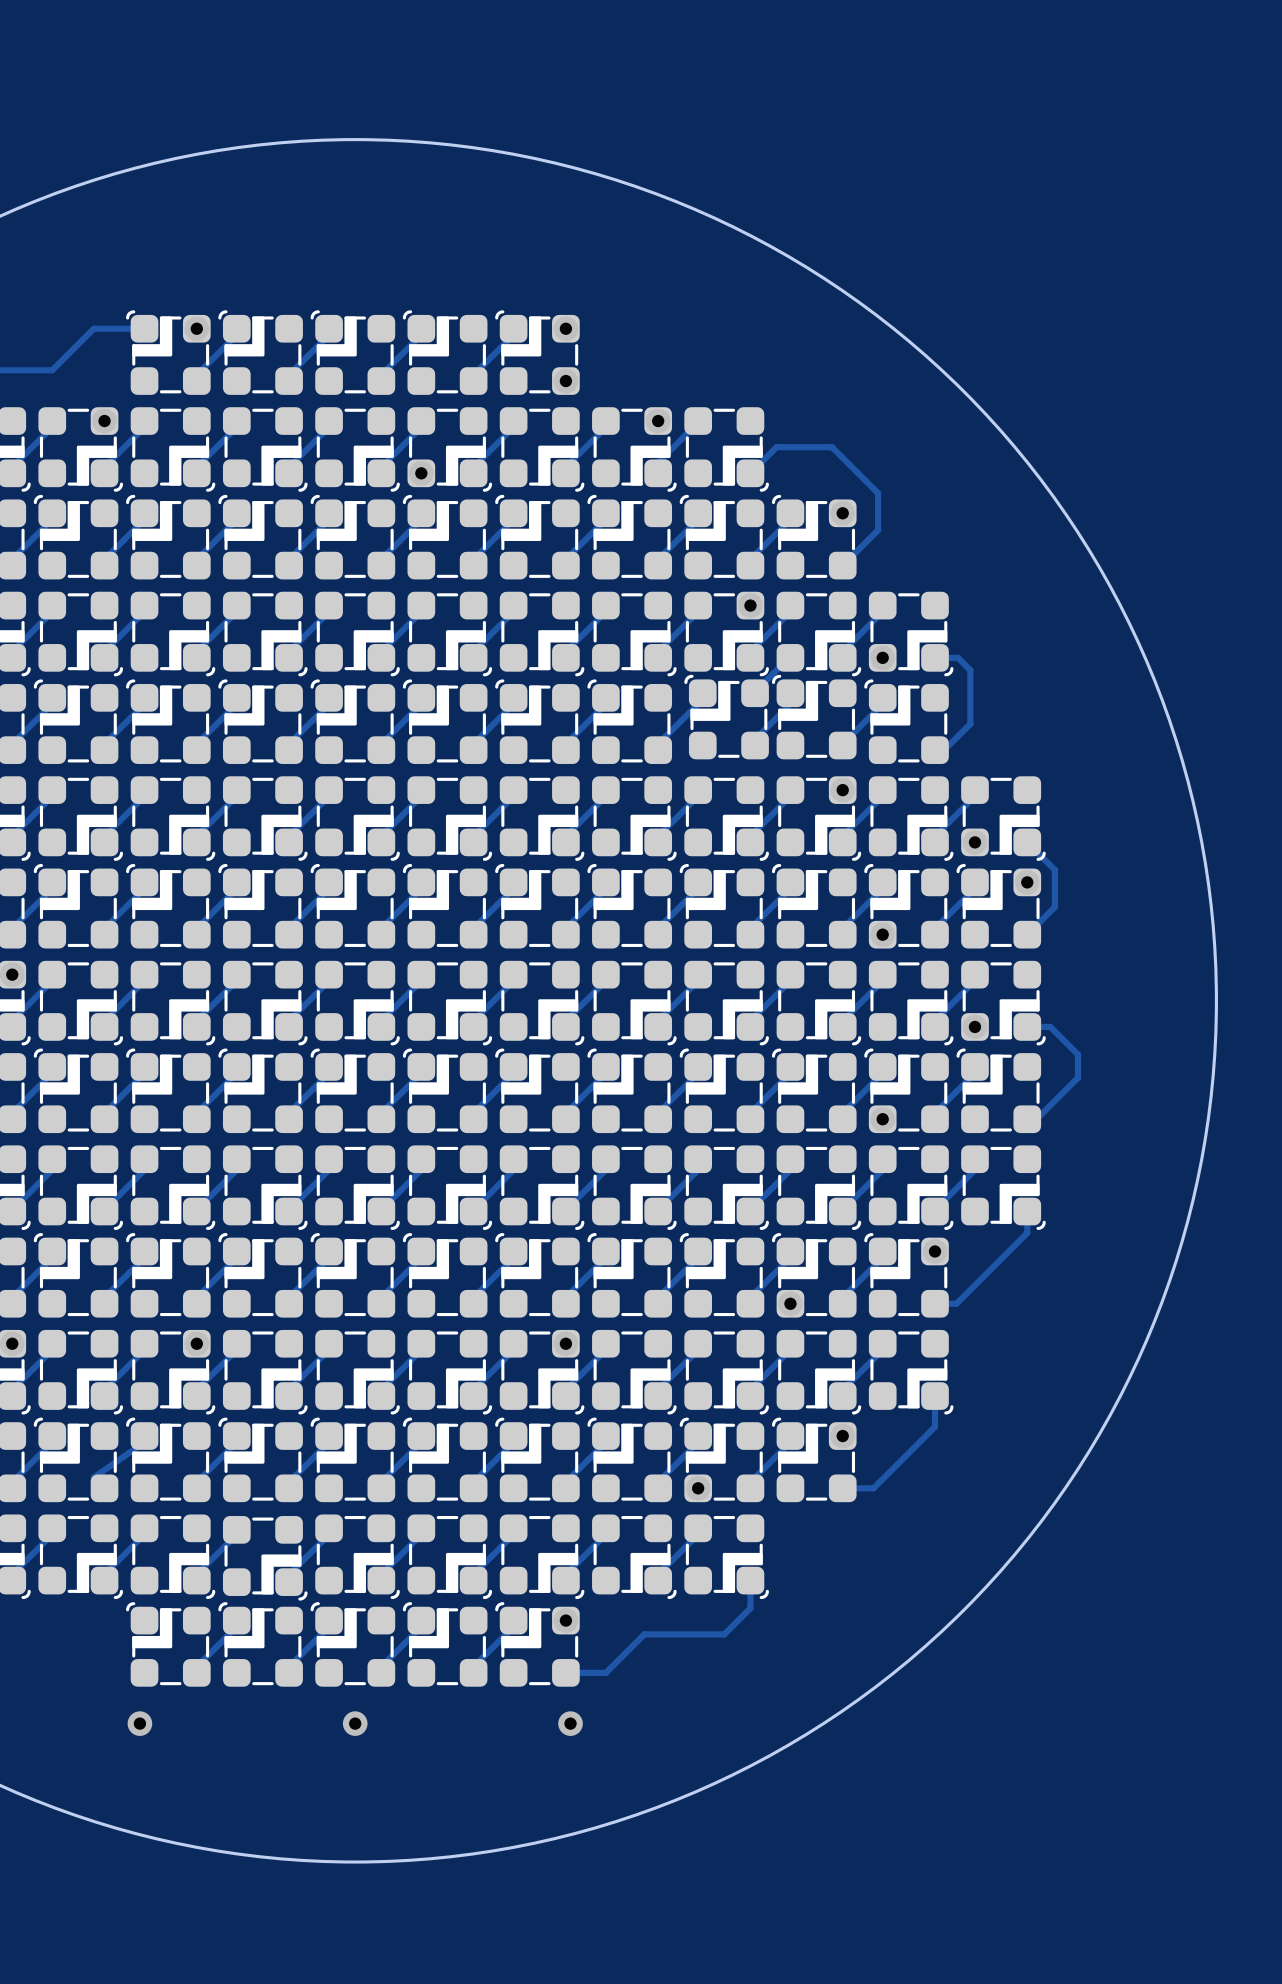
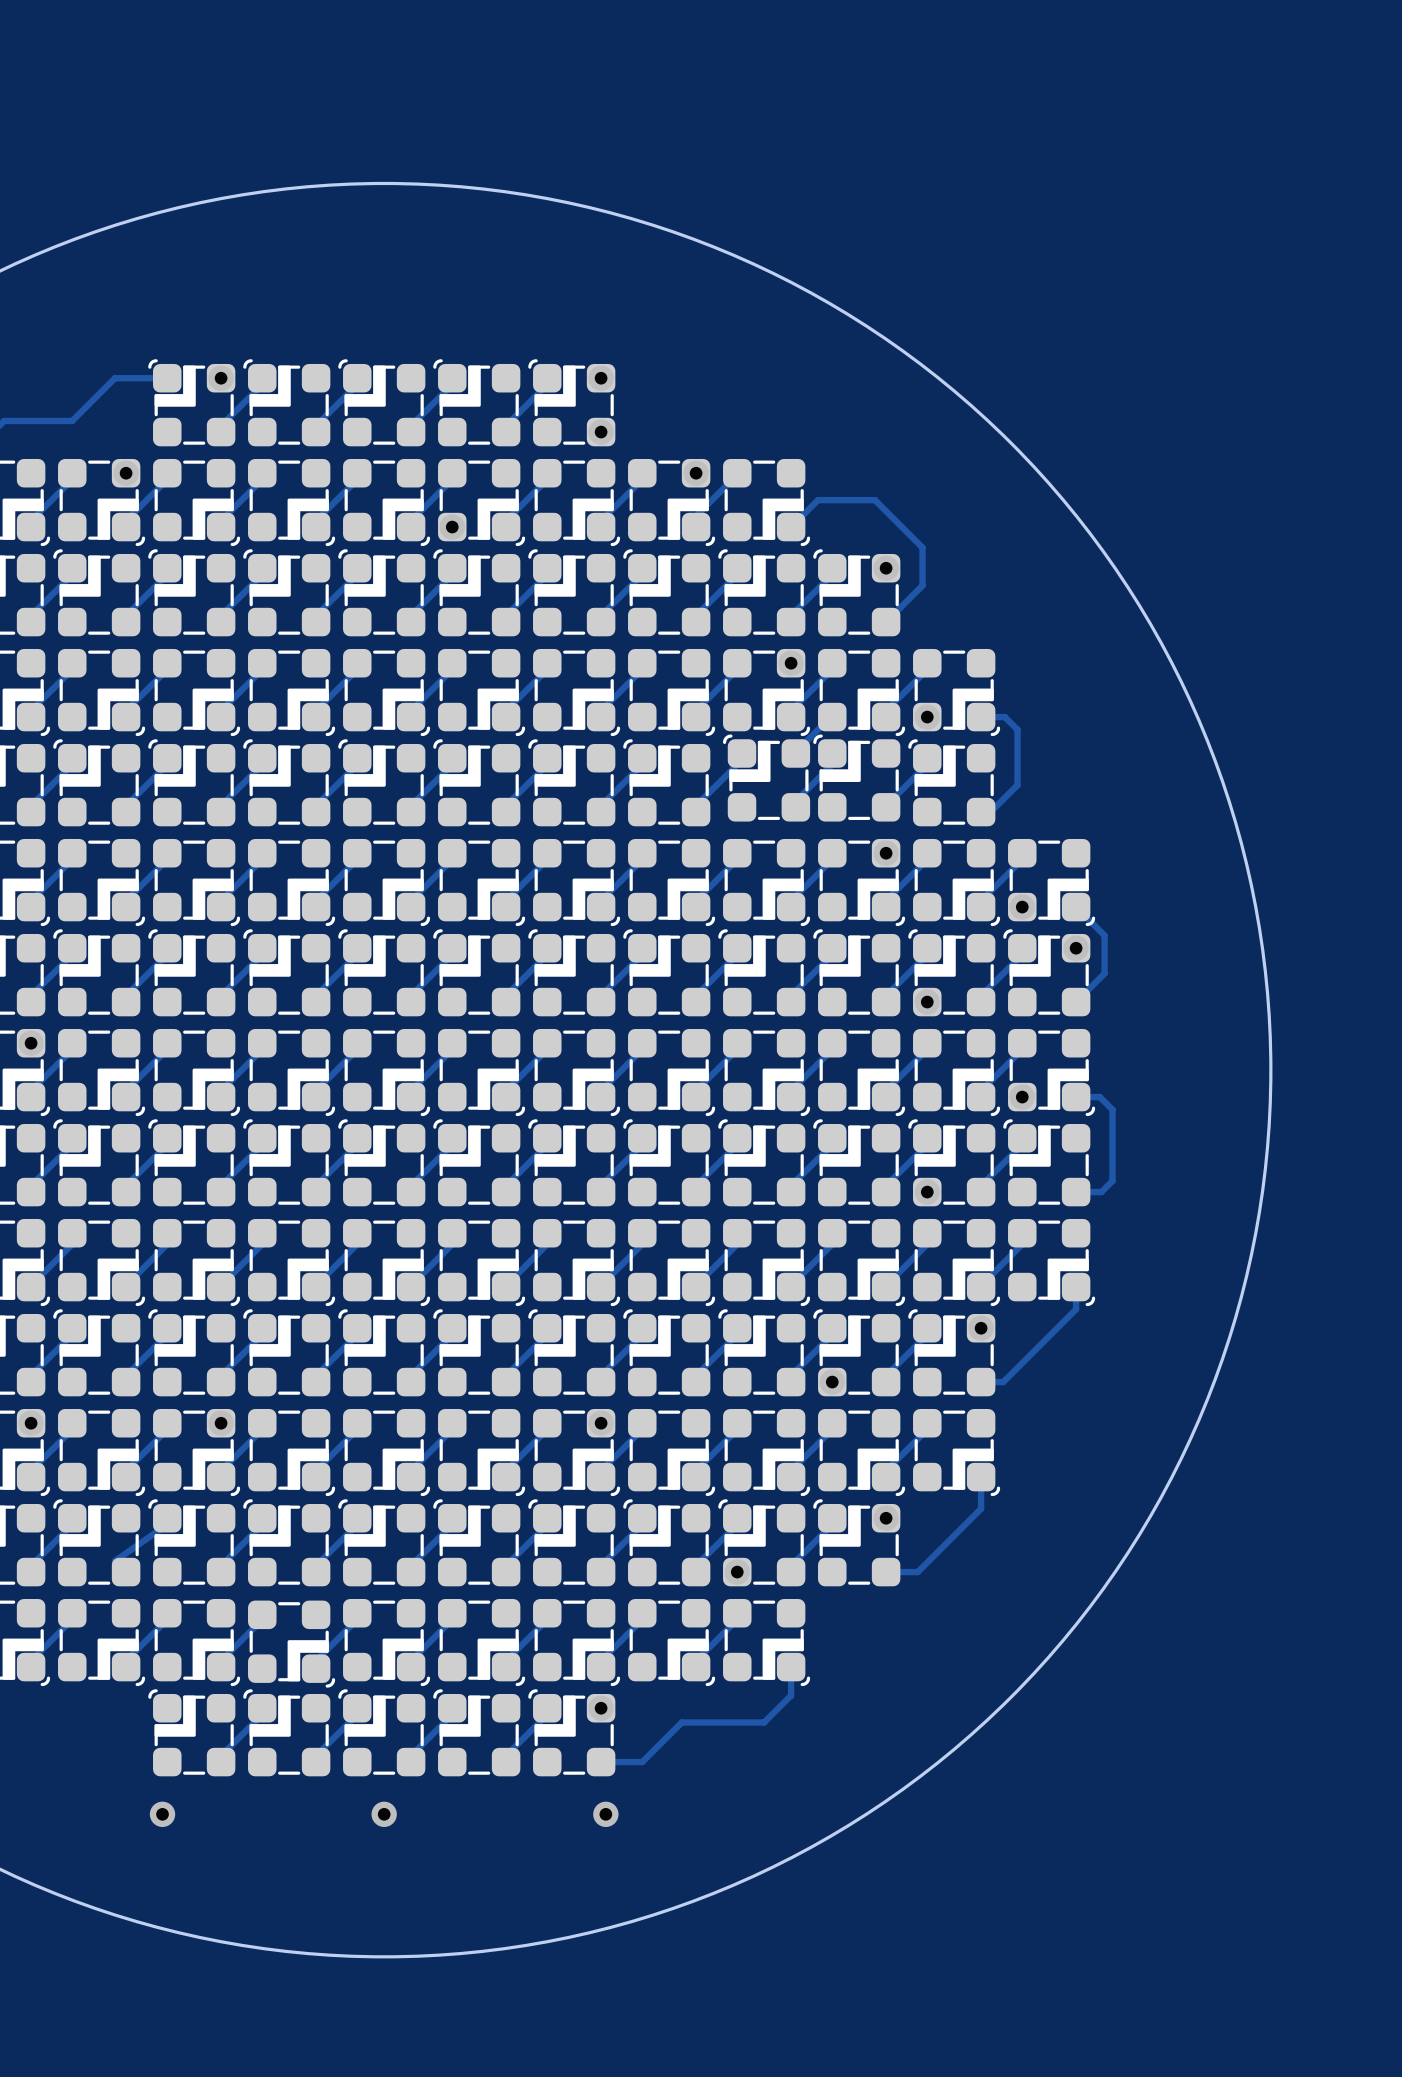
track: (1062, 1039) (1078, 1054) (1078, 1077) (1036, 1119) -> (1112, 1109) (1112, 1180) (1101, 1192) (1076, 1192)

